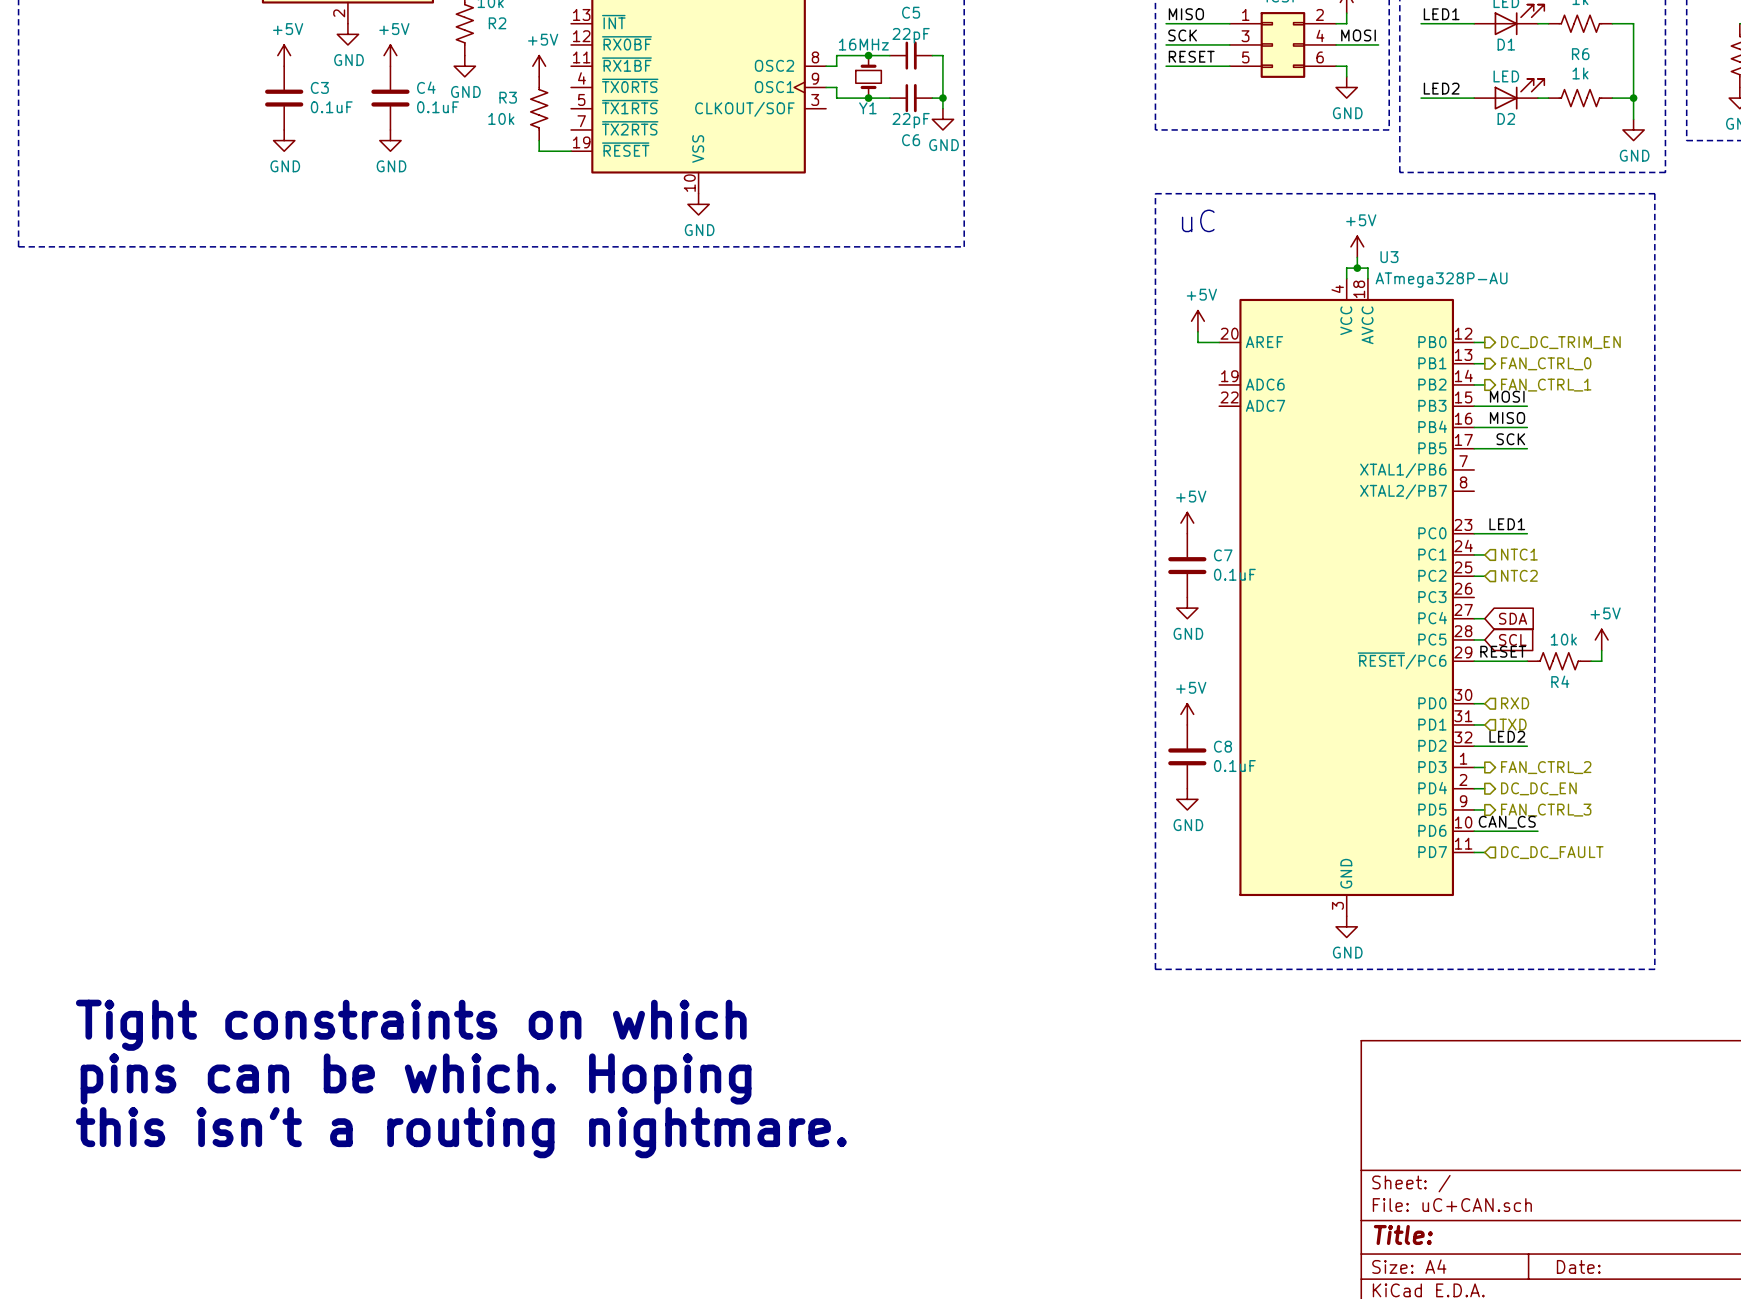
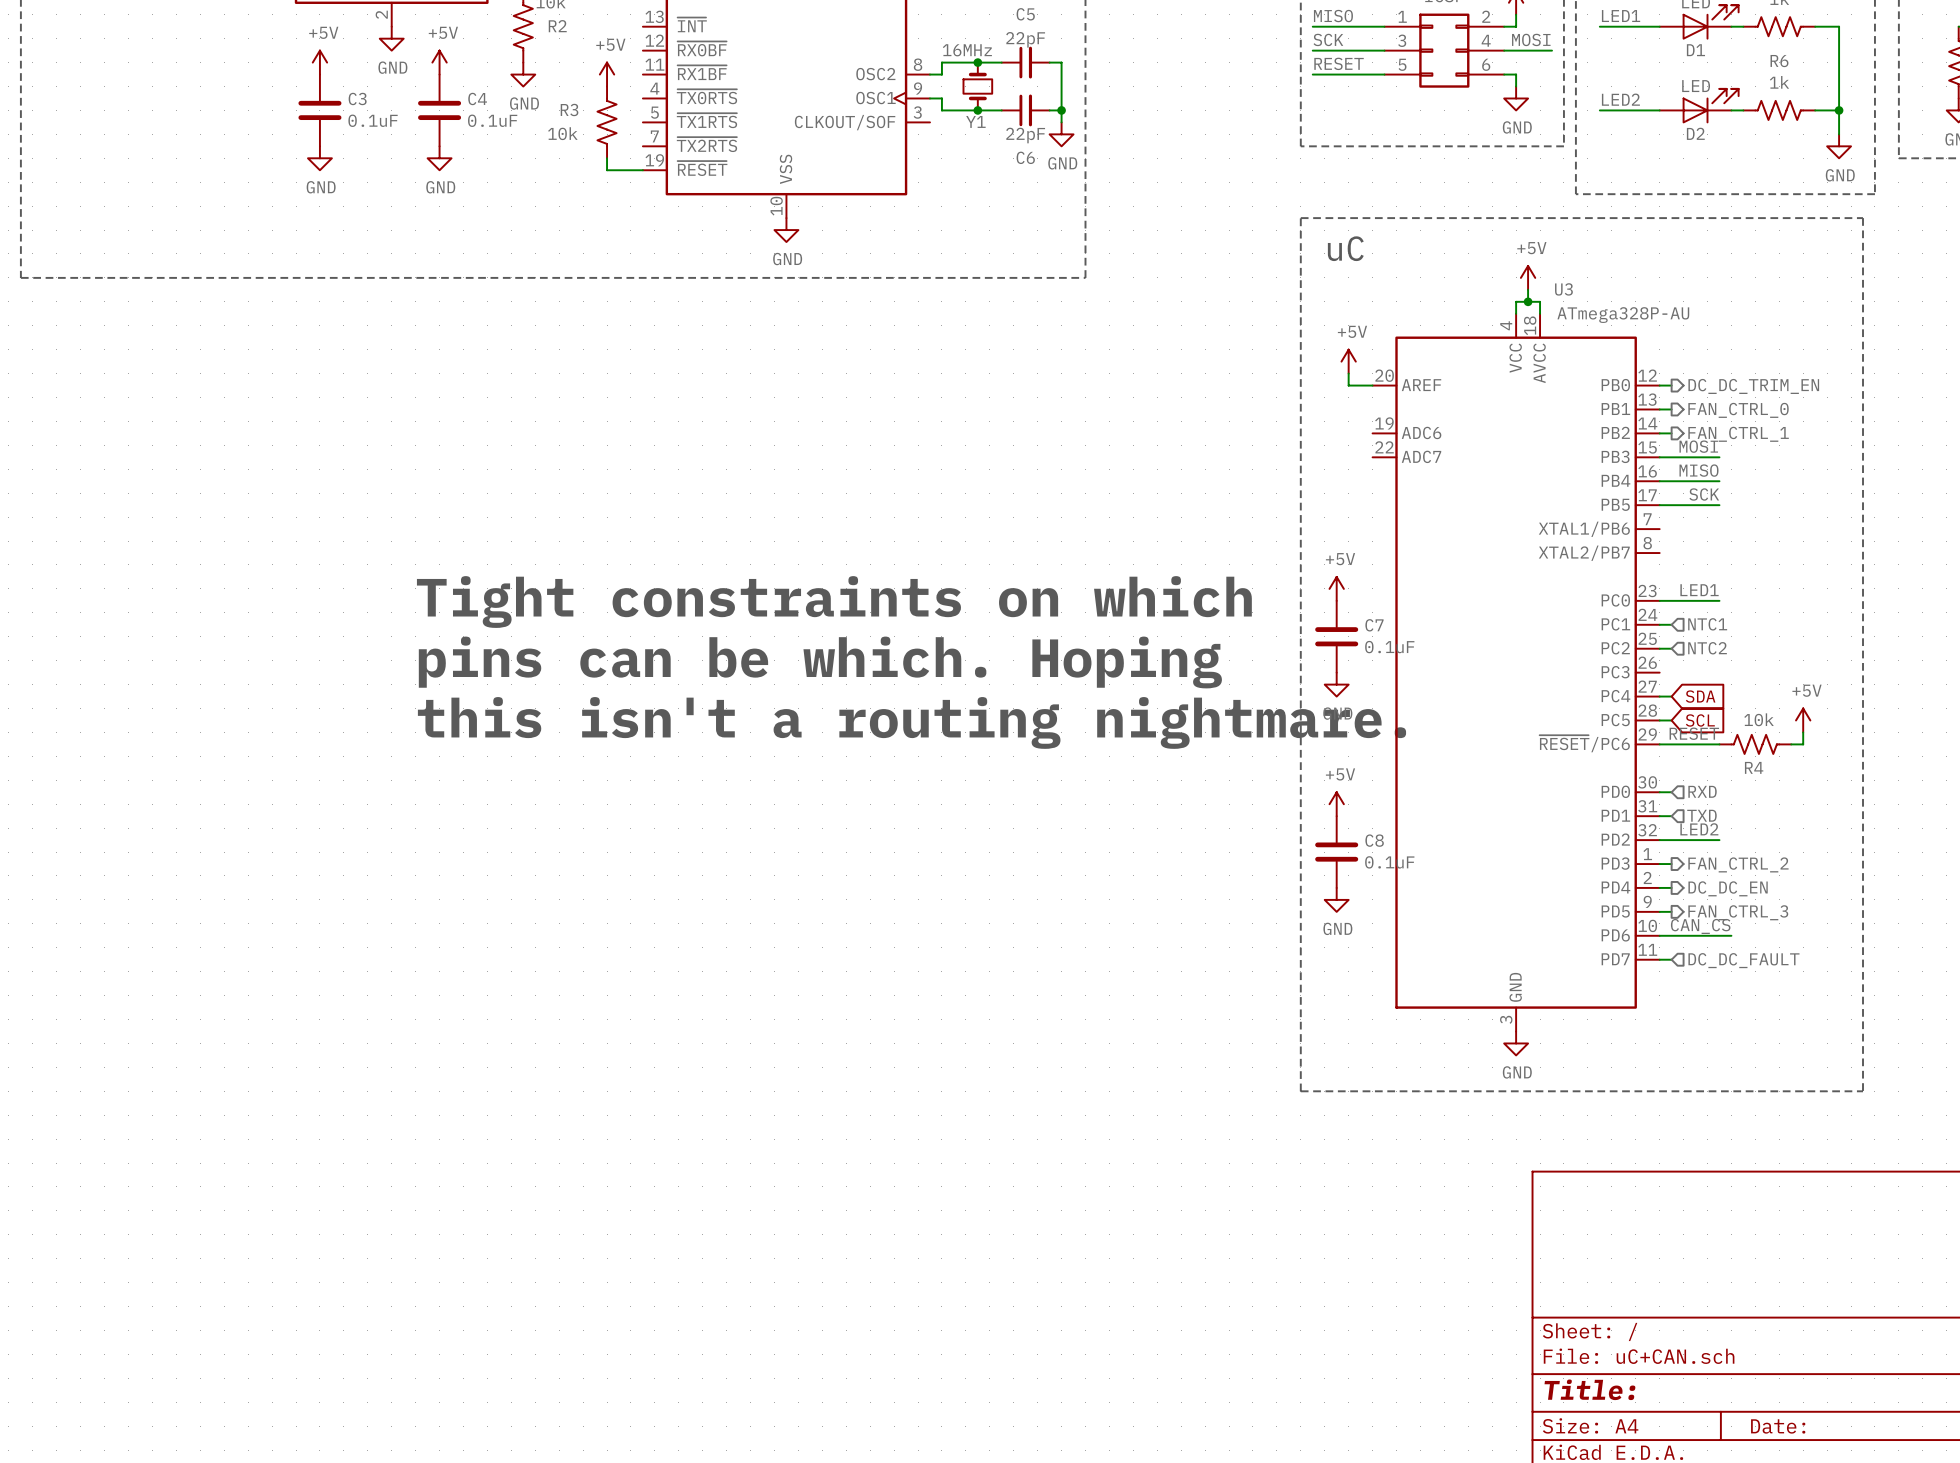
text: none -> Tight constraints on which (834, 602)
text: none -> pins can be which. Hoping (820, 662)
text: none -> this isn't a routing nightmare. (911, 722)
text: Tight constraints on which (411, 1025) -> none
text: pins can be which. Hoping (416, 1078) -> none
text: this isn't a routing nightmare. (461, 1132) -> none

